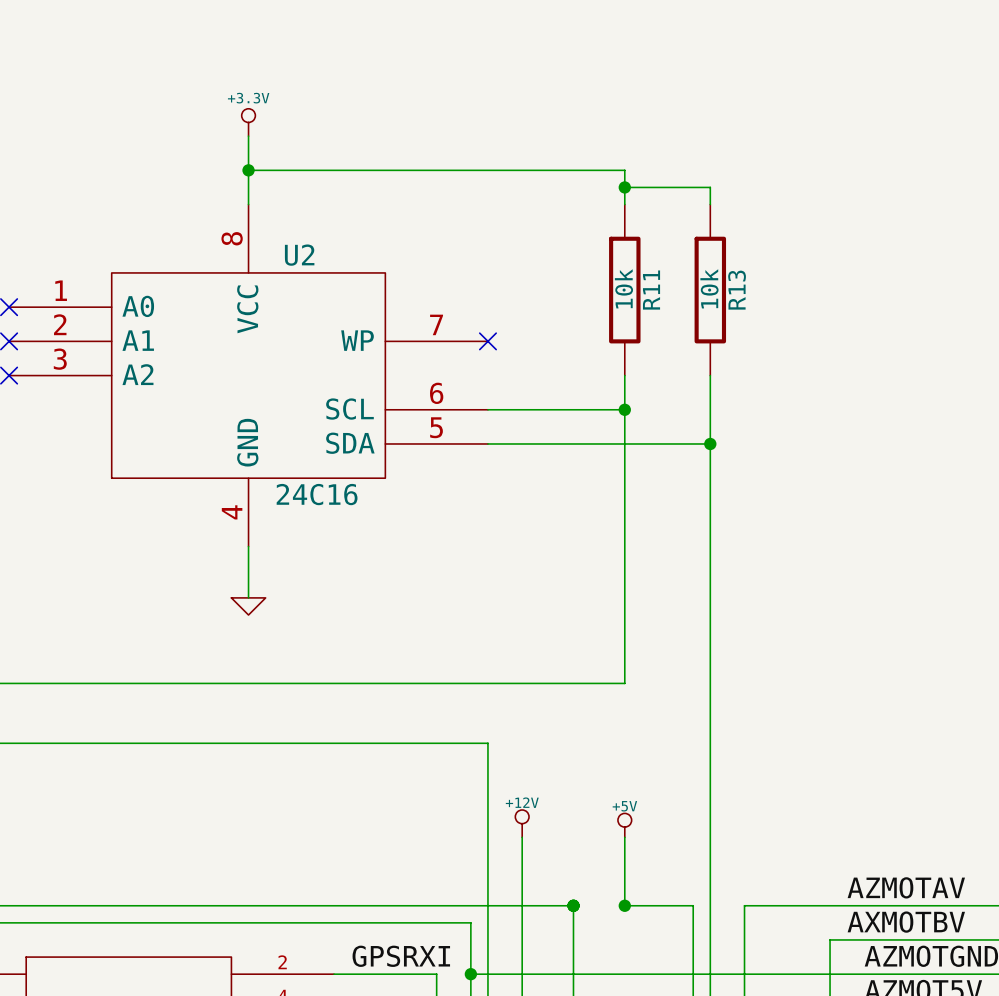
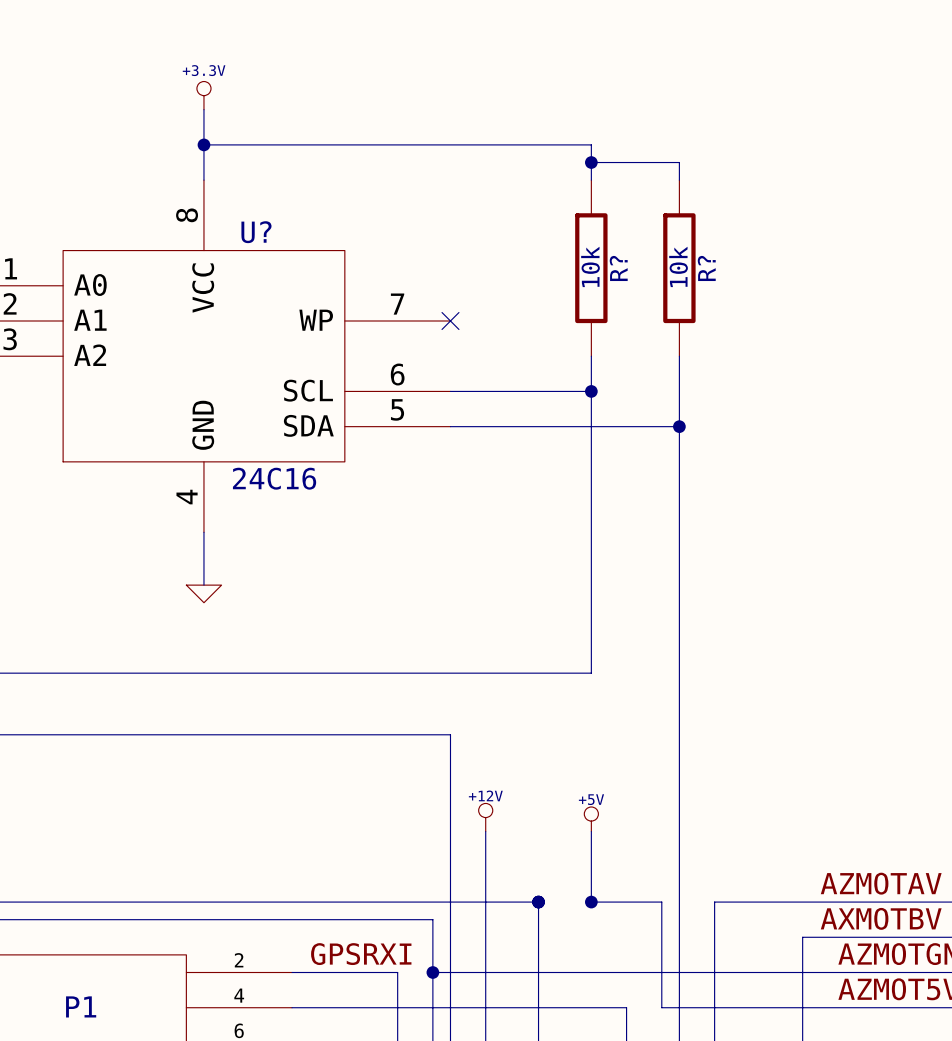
U2 name: U2 (299, 255) -> U? (256, 232)
R11 name: R11 (651, 290) -> R? (618, 268)
R13 name: R13 (737, 290) -> R? (706, 268)

